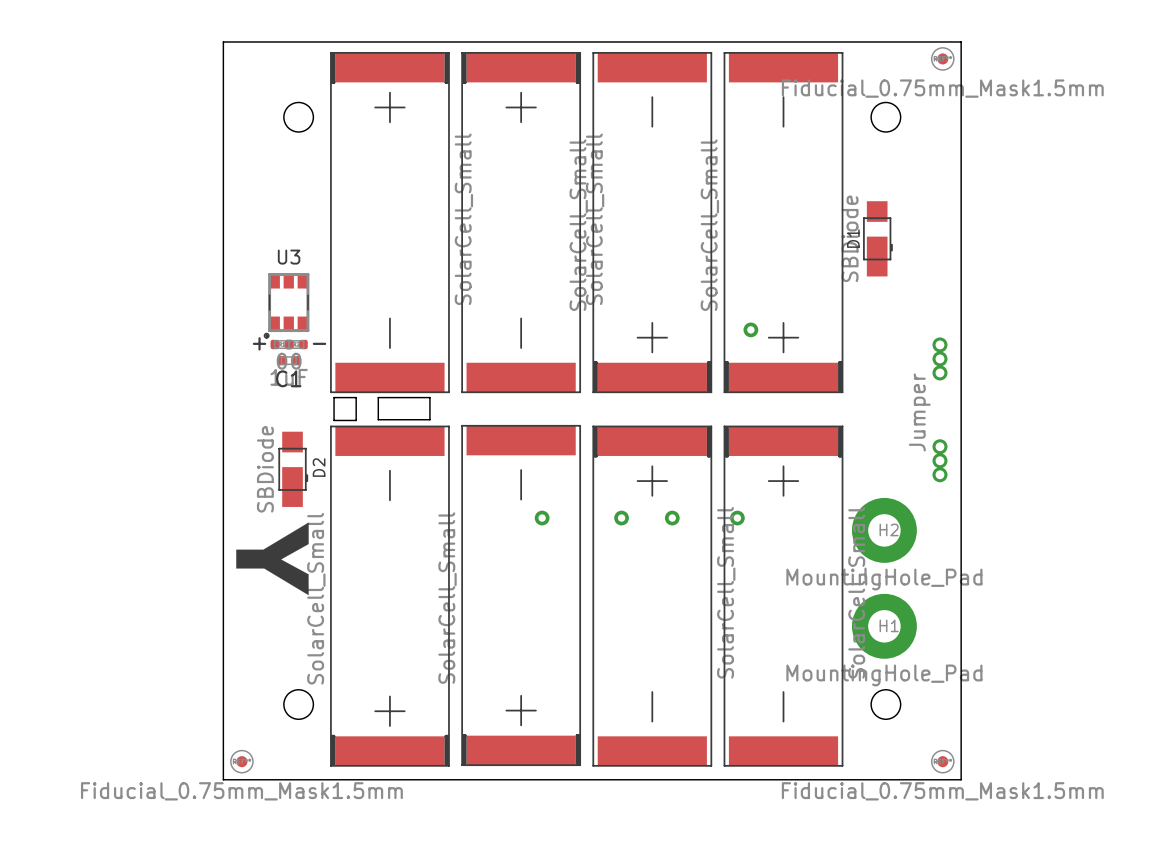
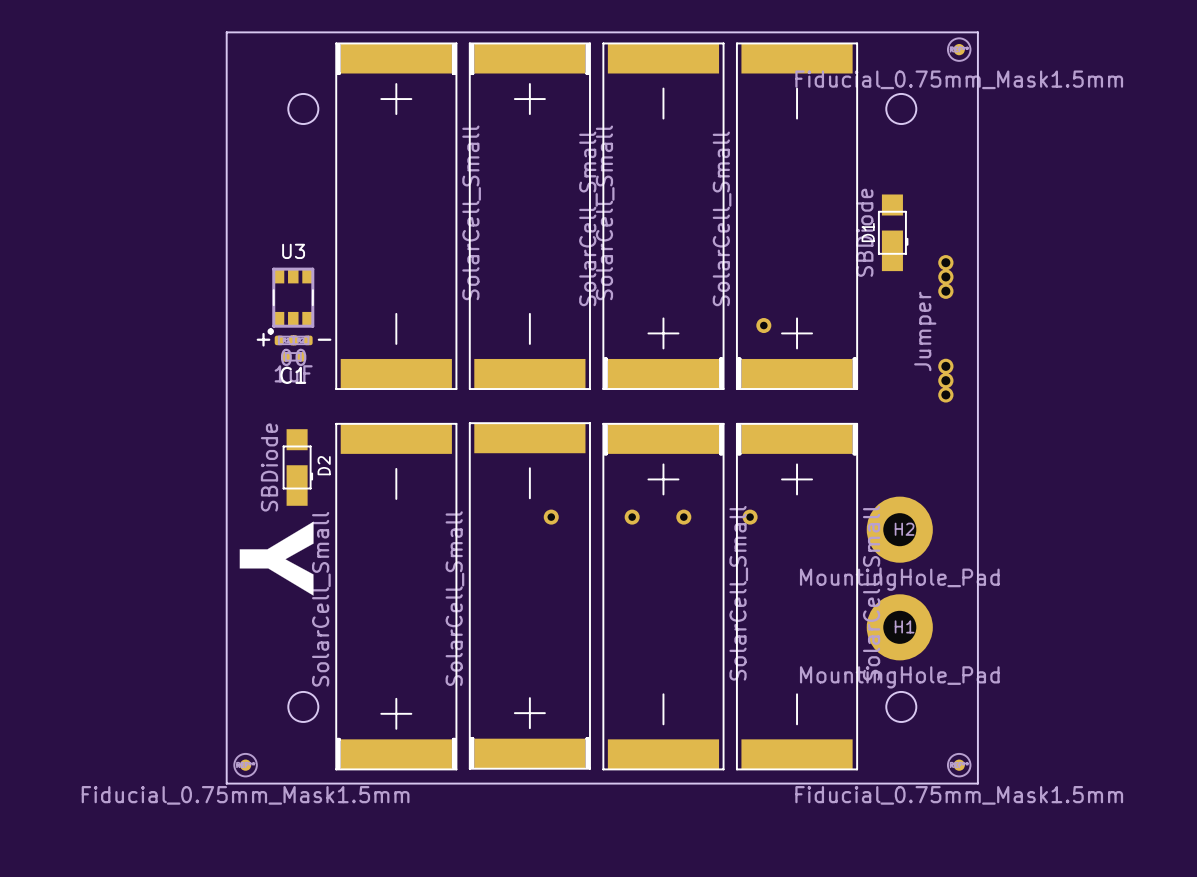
board edge: (334, 397) (356, 397) (356, 420) (334, 420) (334, 397) -> none
board edge: (378, 397) (378, 419) (429, 419) (429, 397) (378, 397) -> none
part position: (939, 409) -> (945, 328)

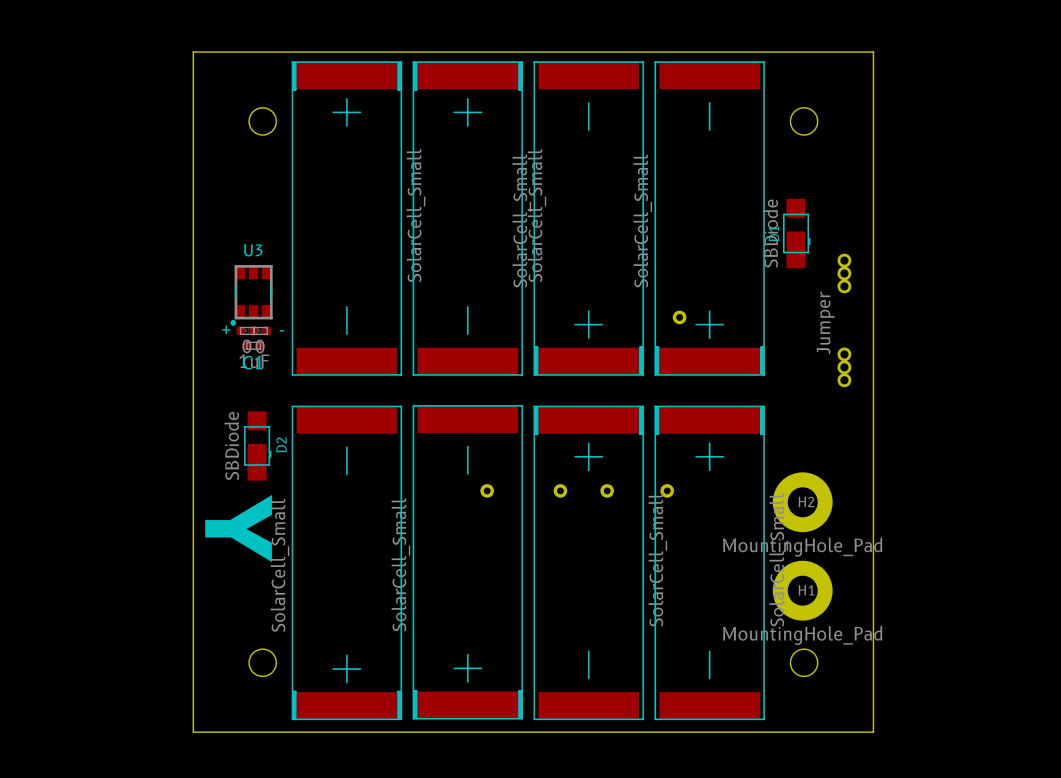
part: Fiducial_0.75mm_Mask1.5mm (959, 49) -> none
part: Fiducial_0.75mm_Mask1.5mm (245, 765) -> none
part: Fiducial_0.75mm_Mask1.5mm (959, 765) -> none

